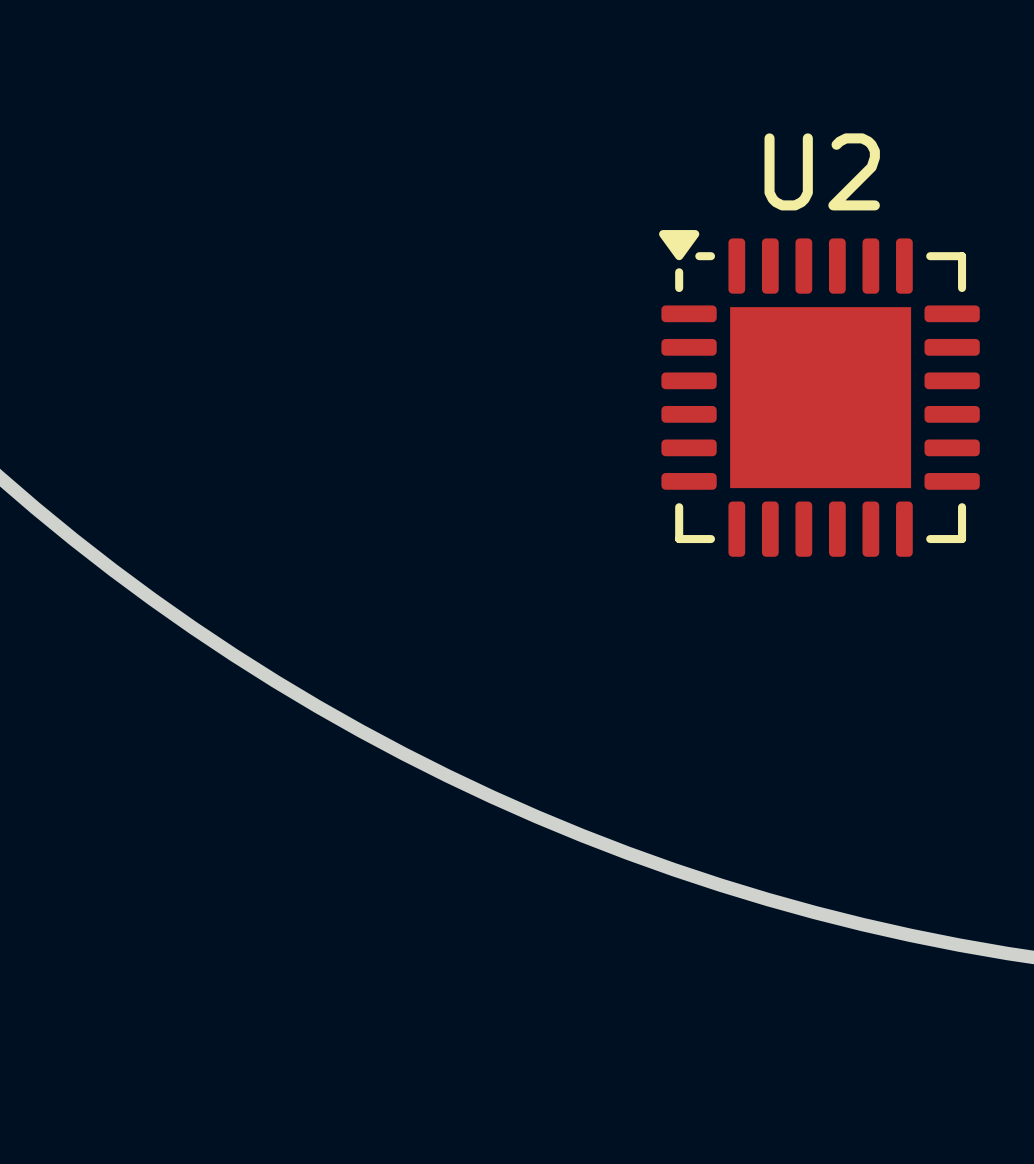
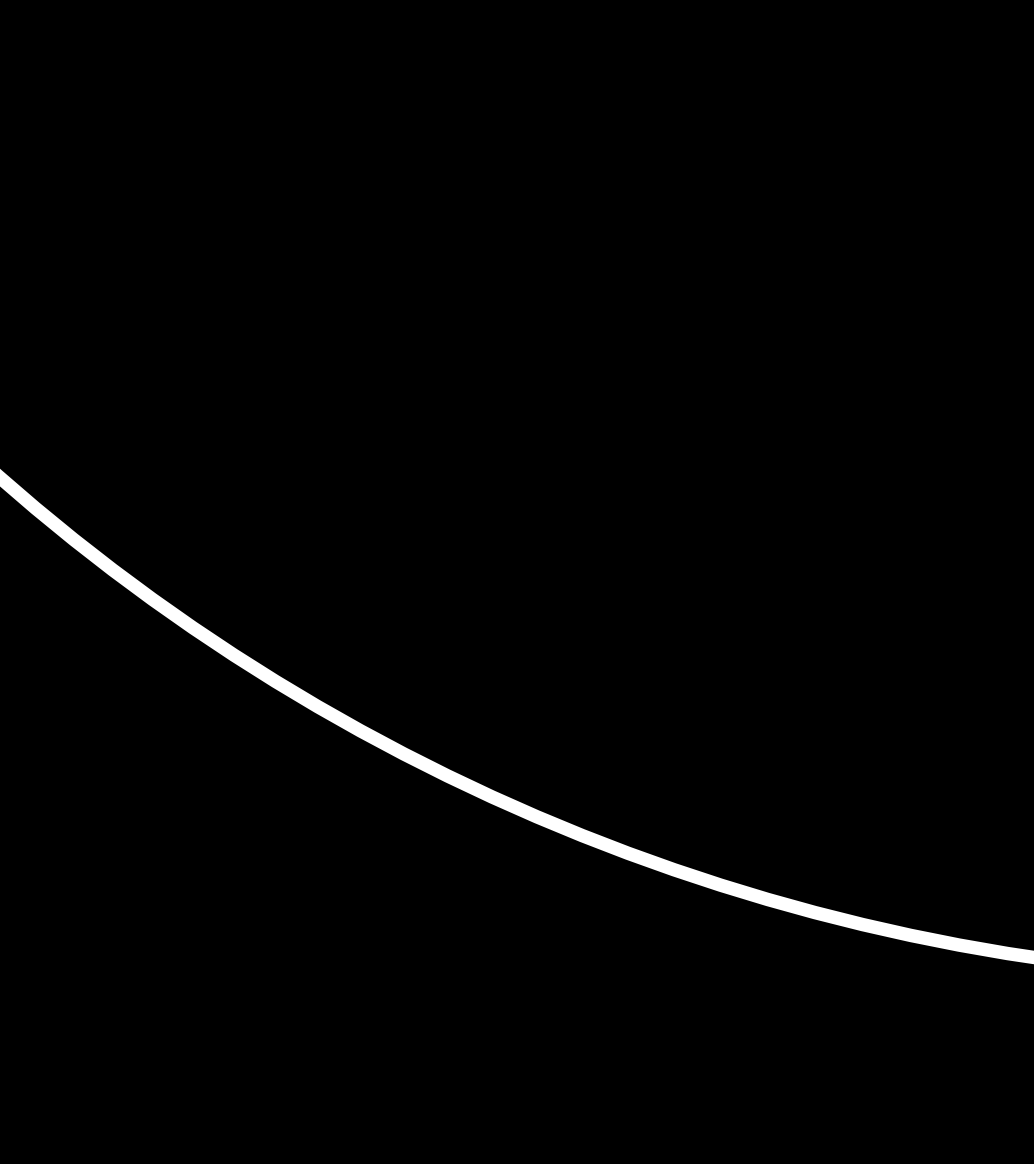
U2: (819, 393) -> none

